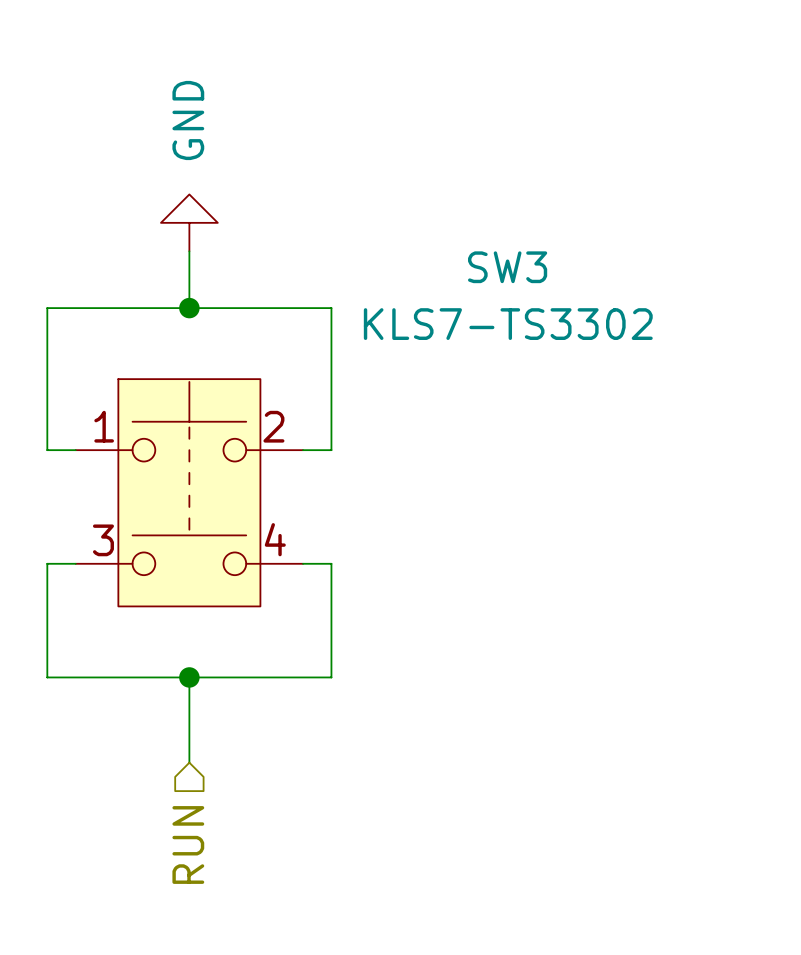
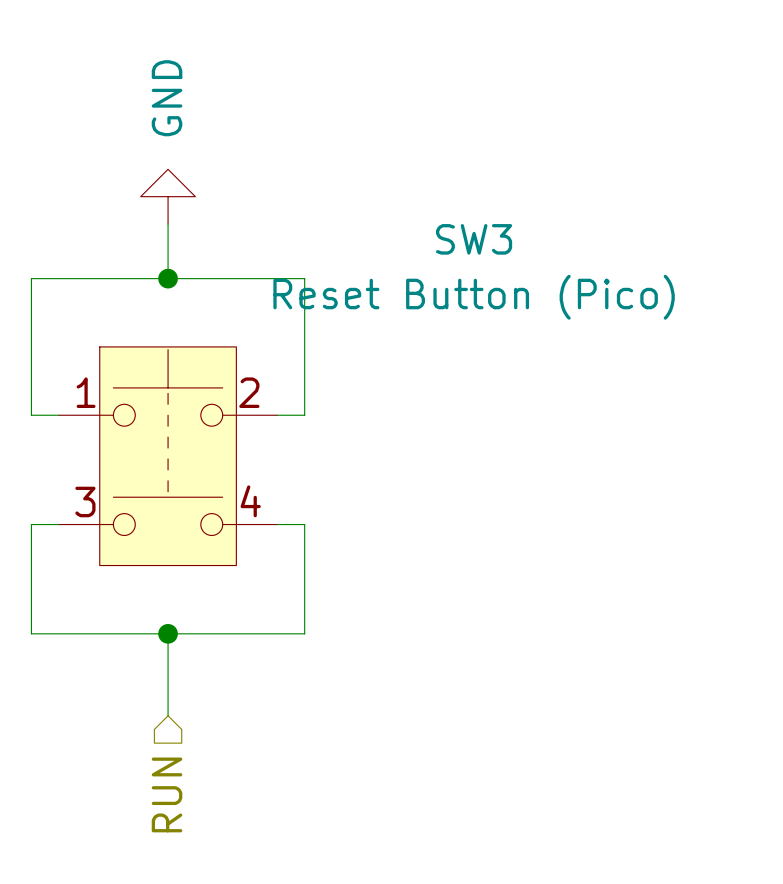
SW3 value: KLS7-TS3302 (508, 324) -> Reset Button (Pico) (474, 297)

